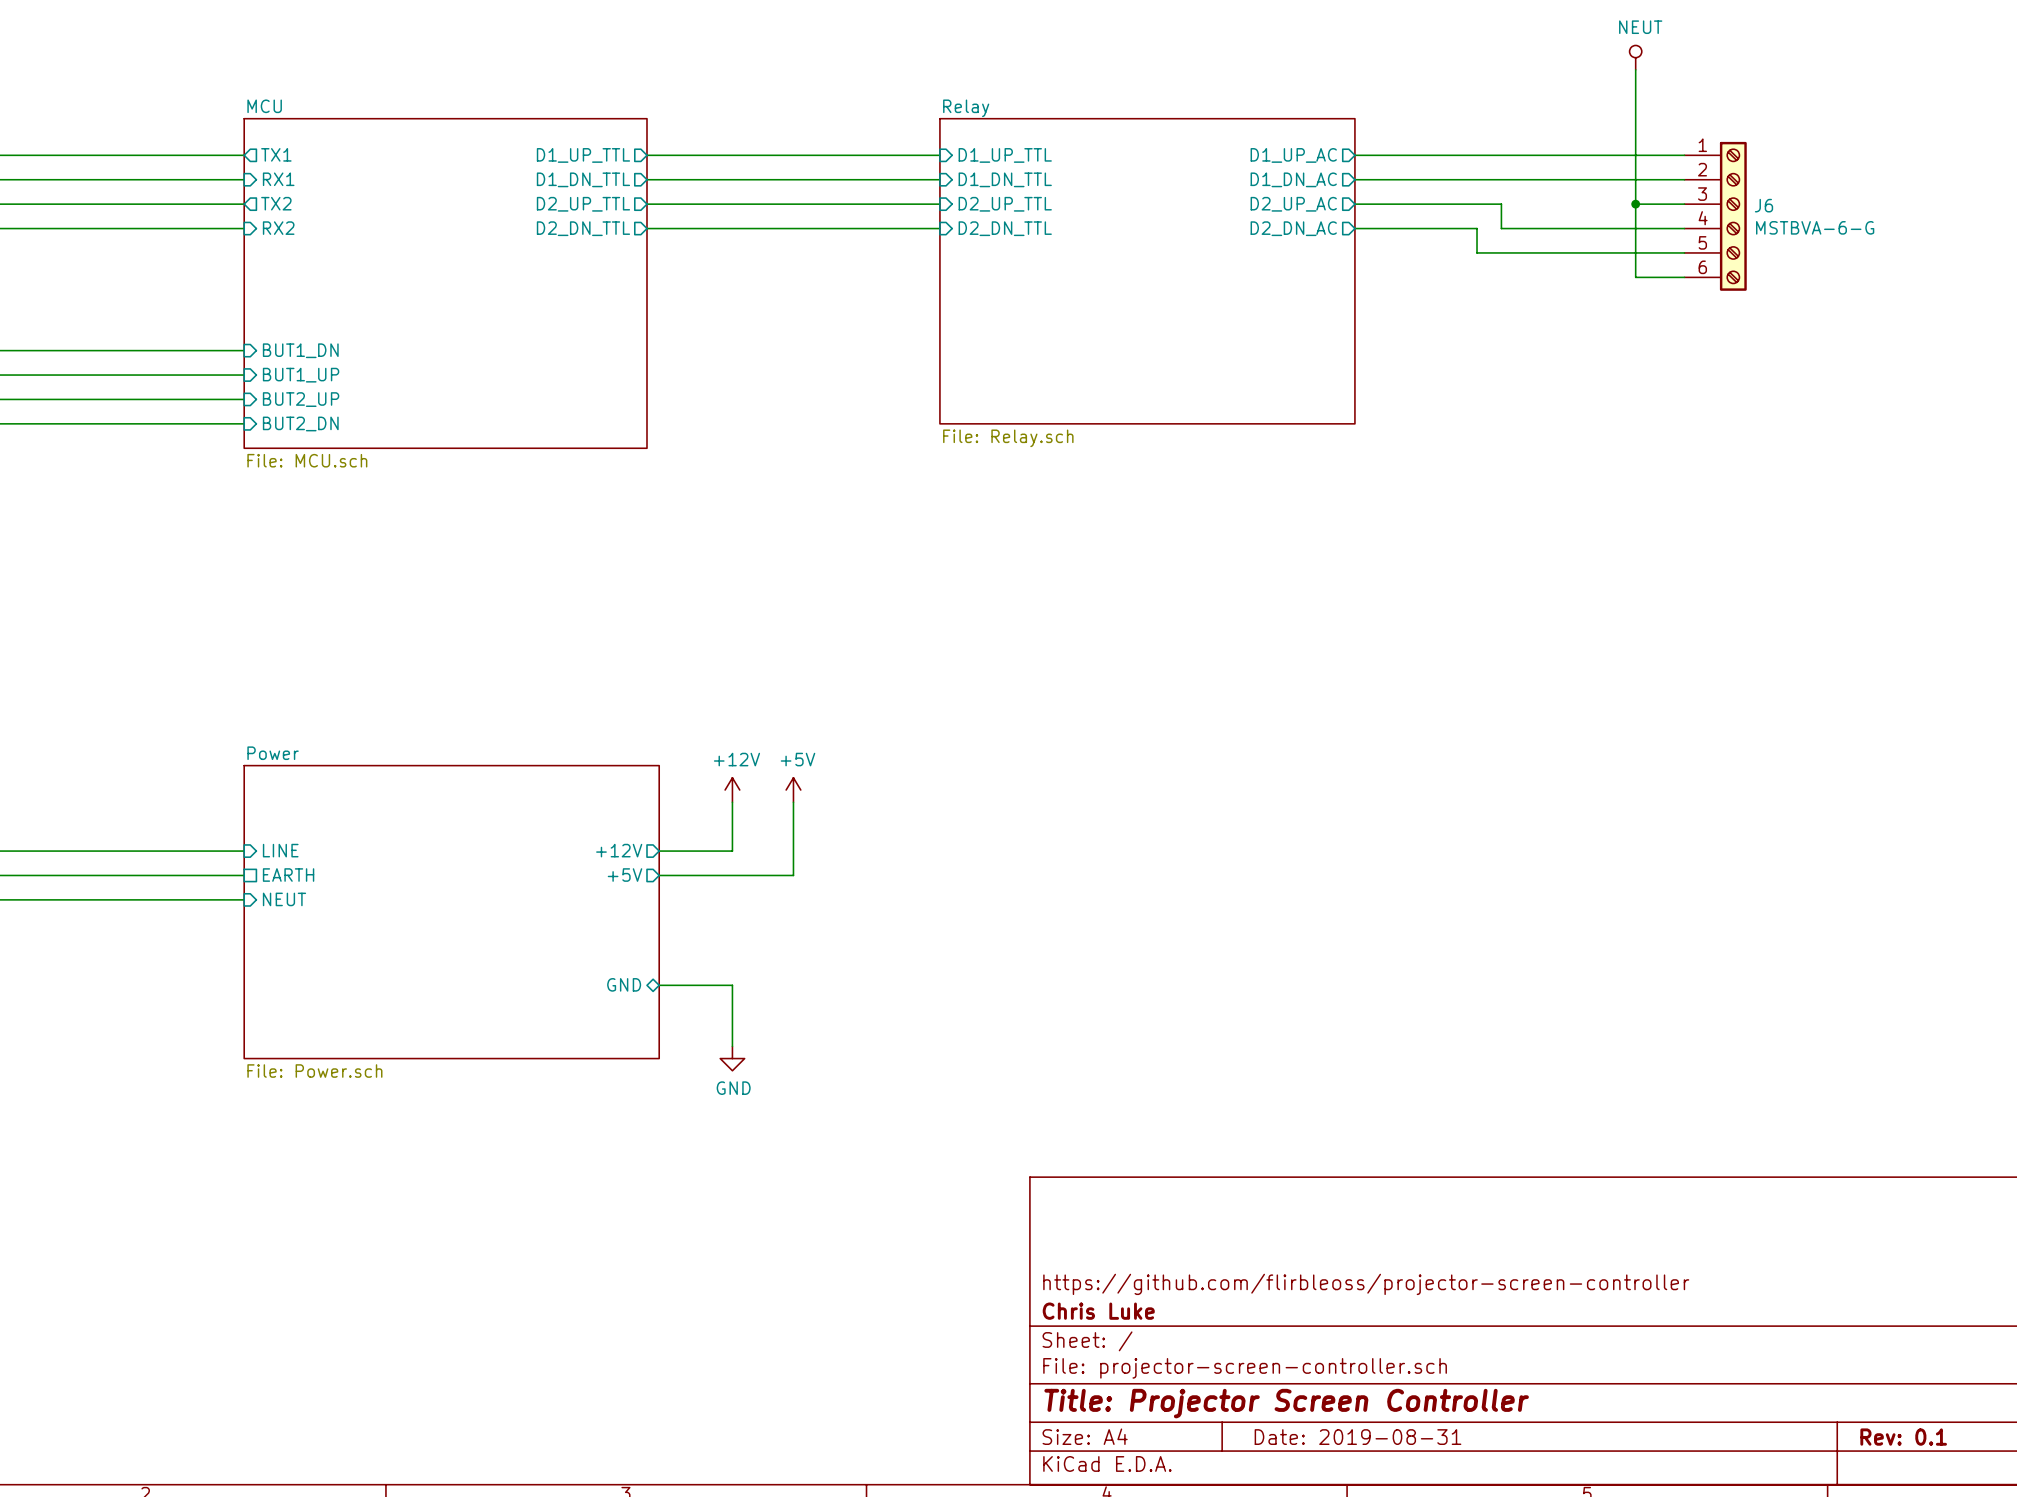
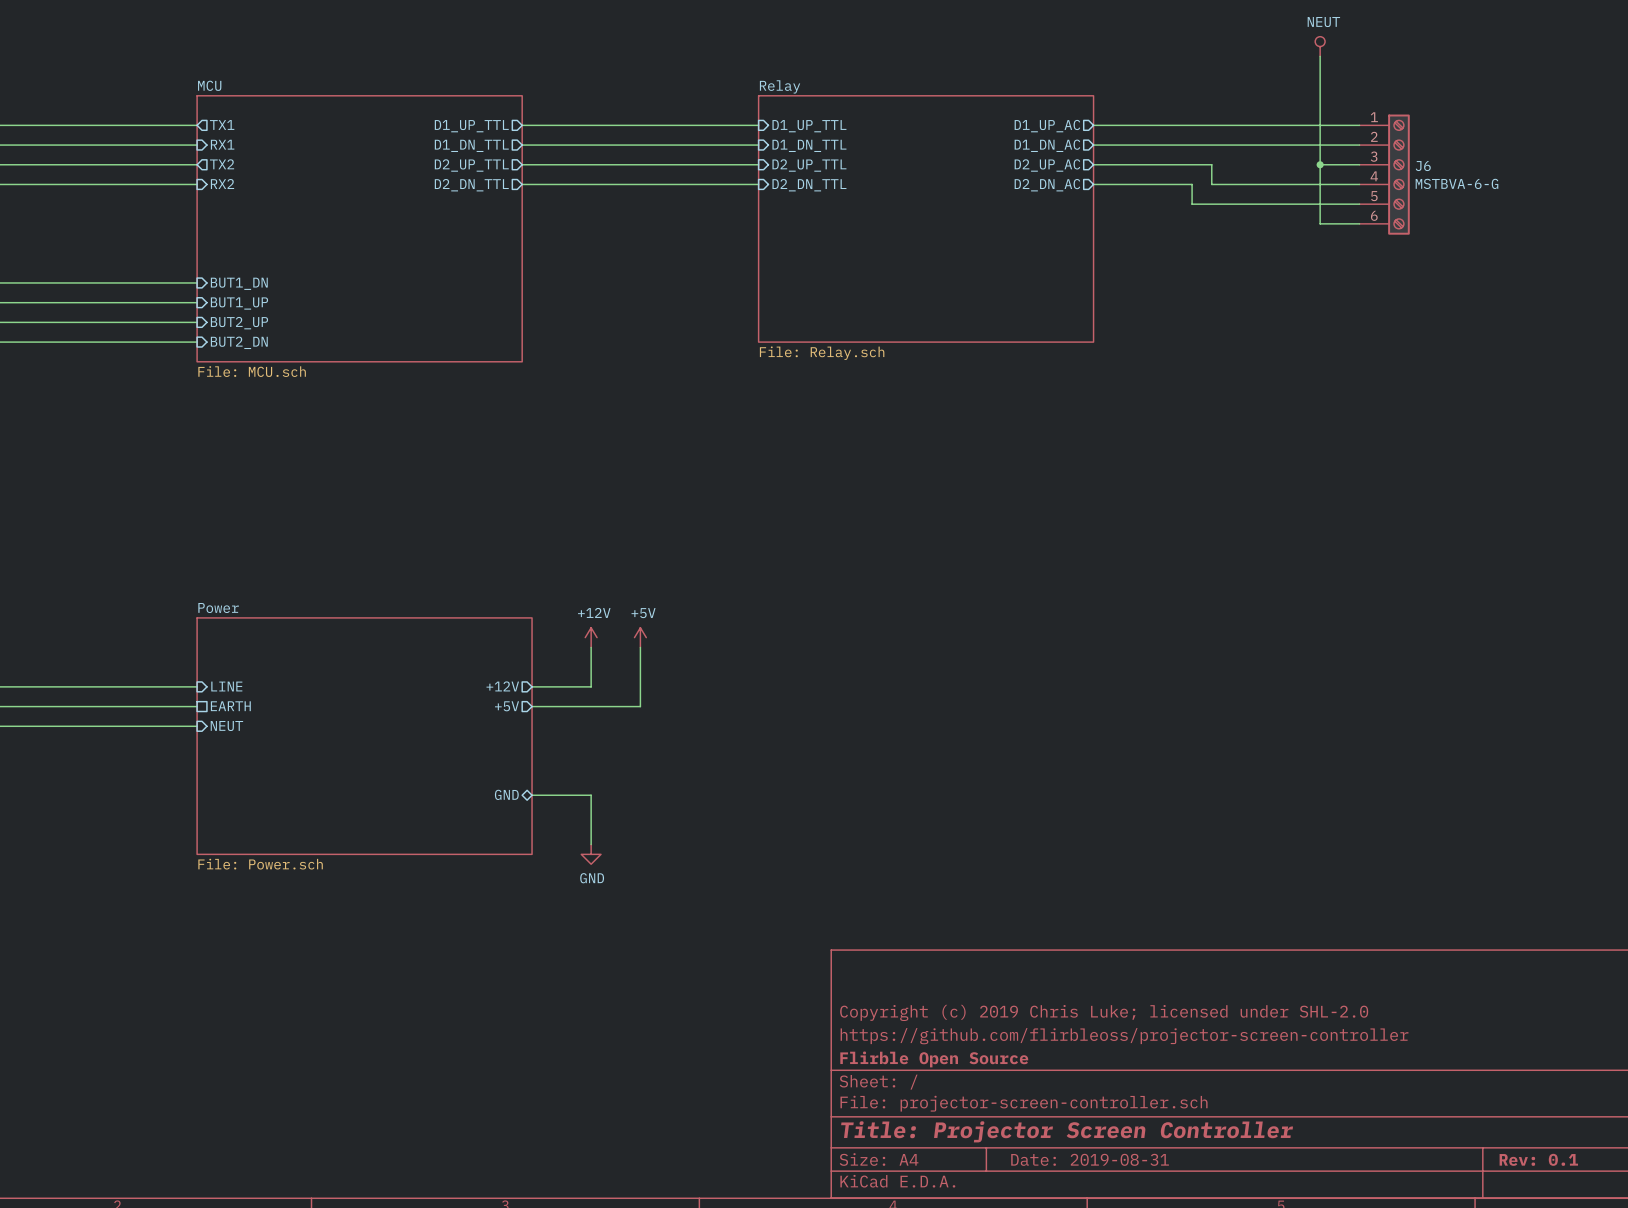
title block: none -> Copyright (c) 2019 Chris Luke; licensed under SHL-2.0 (1104, 1012)
title block: Chris Luke (1098, 1311) -> Flirble Open Source (934, 1059)

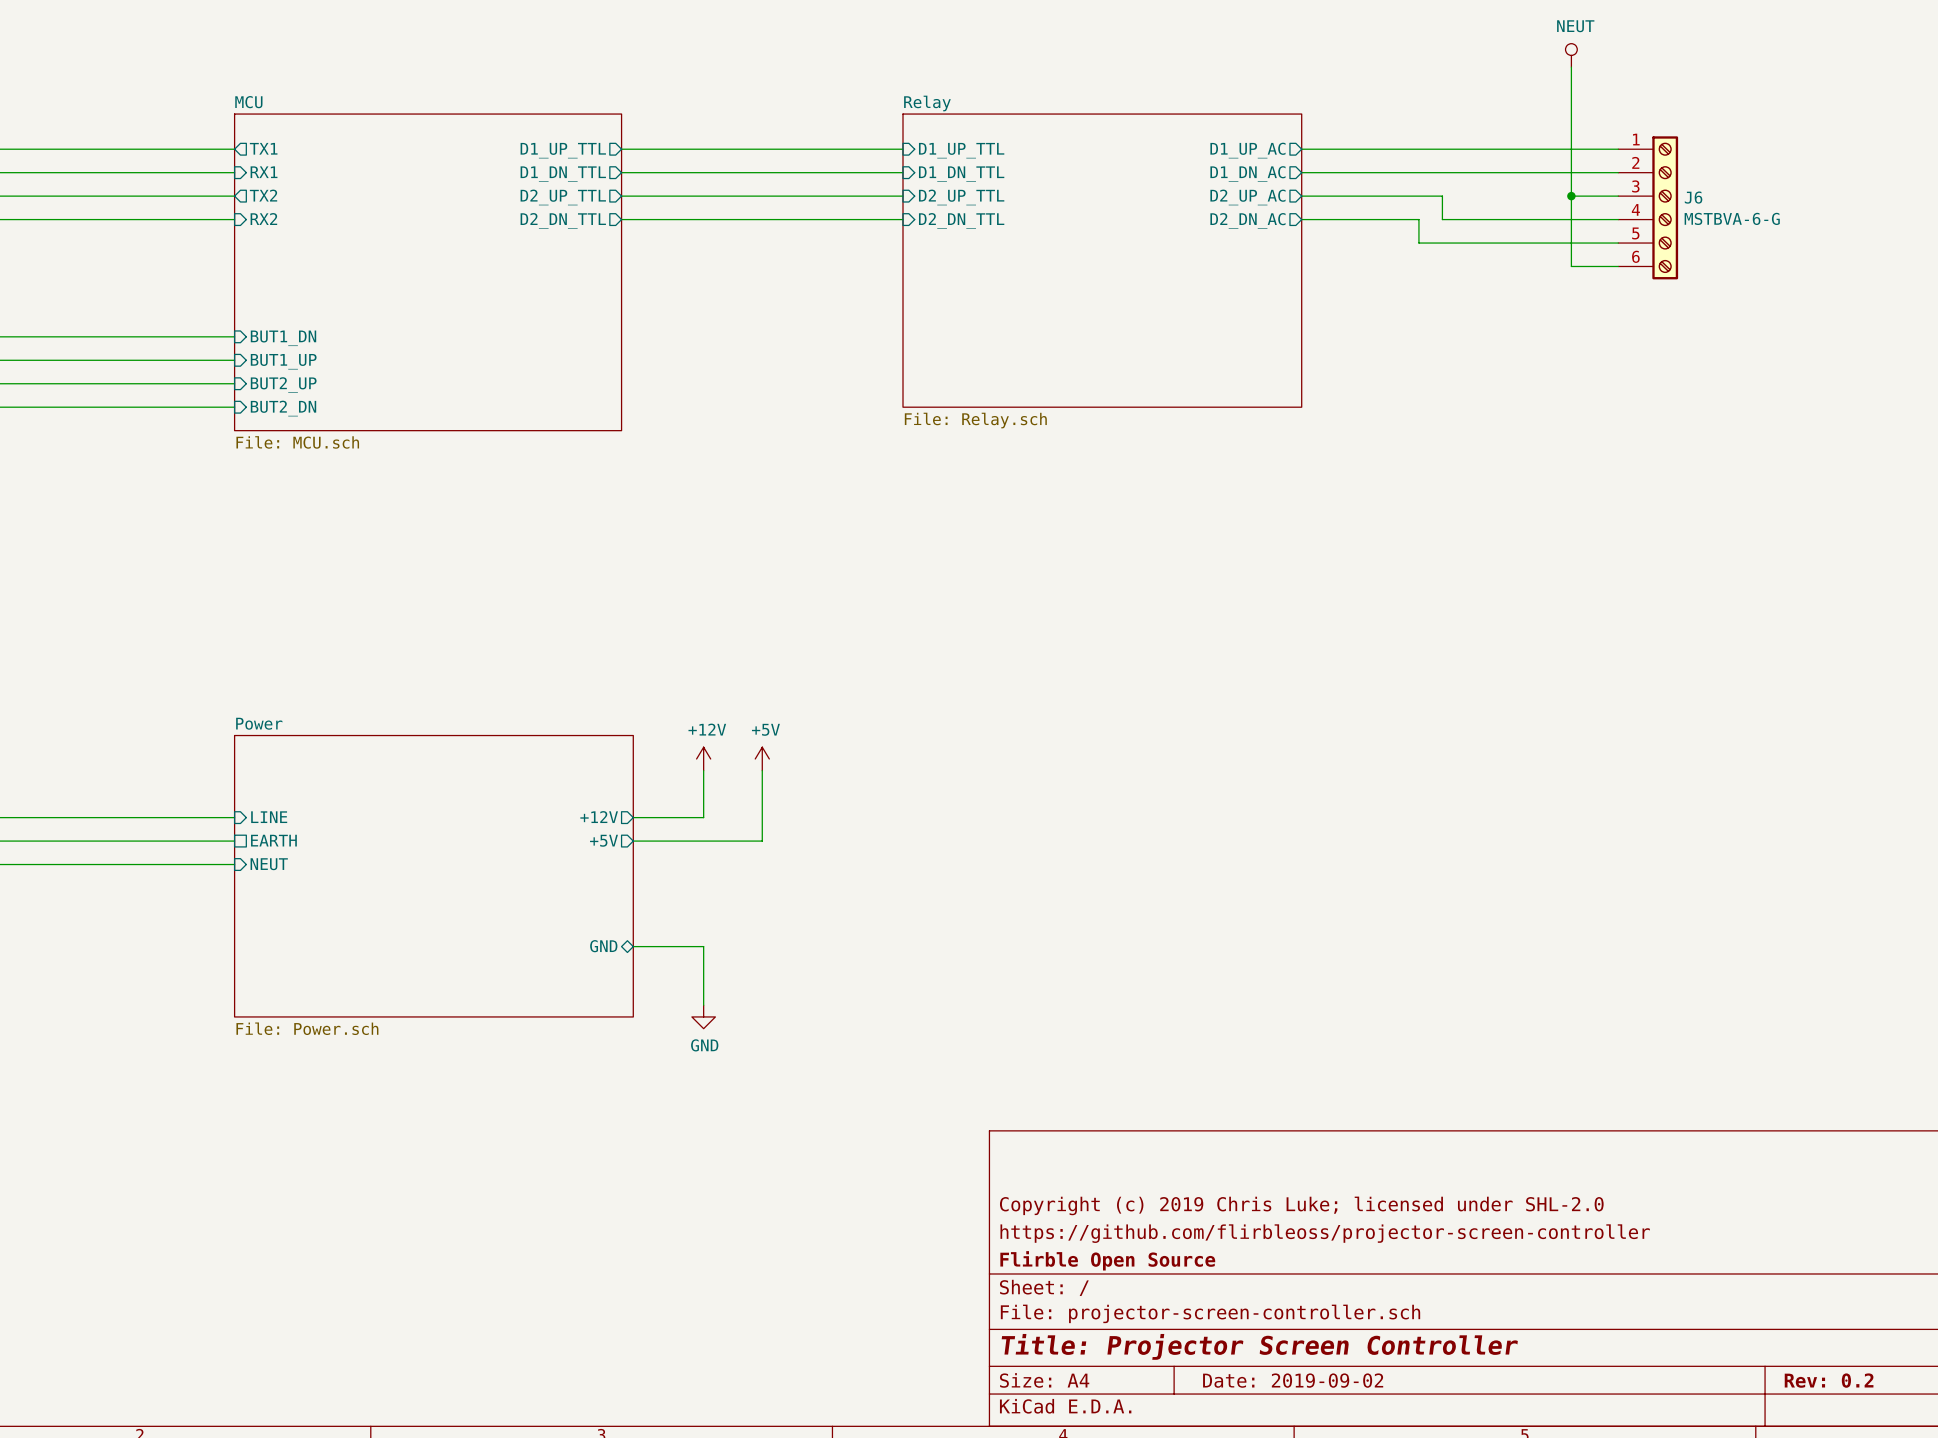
title block: Date: 2019-08-31 (1090, 1159) -> Date: 2019-09-02 (1293, 1380)
title block: Rev: 0.1 (1538, 1159) -> Rev: 0.2 (1829, 1380)

